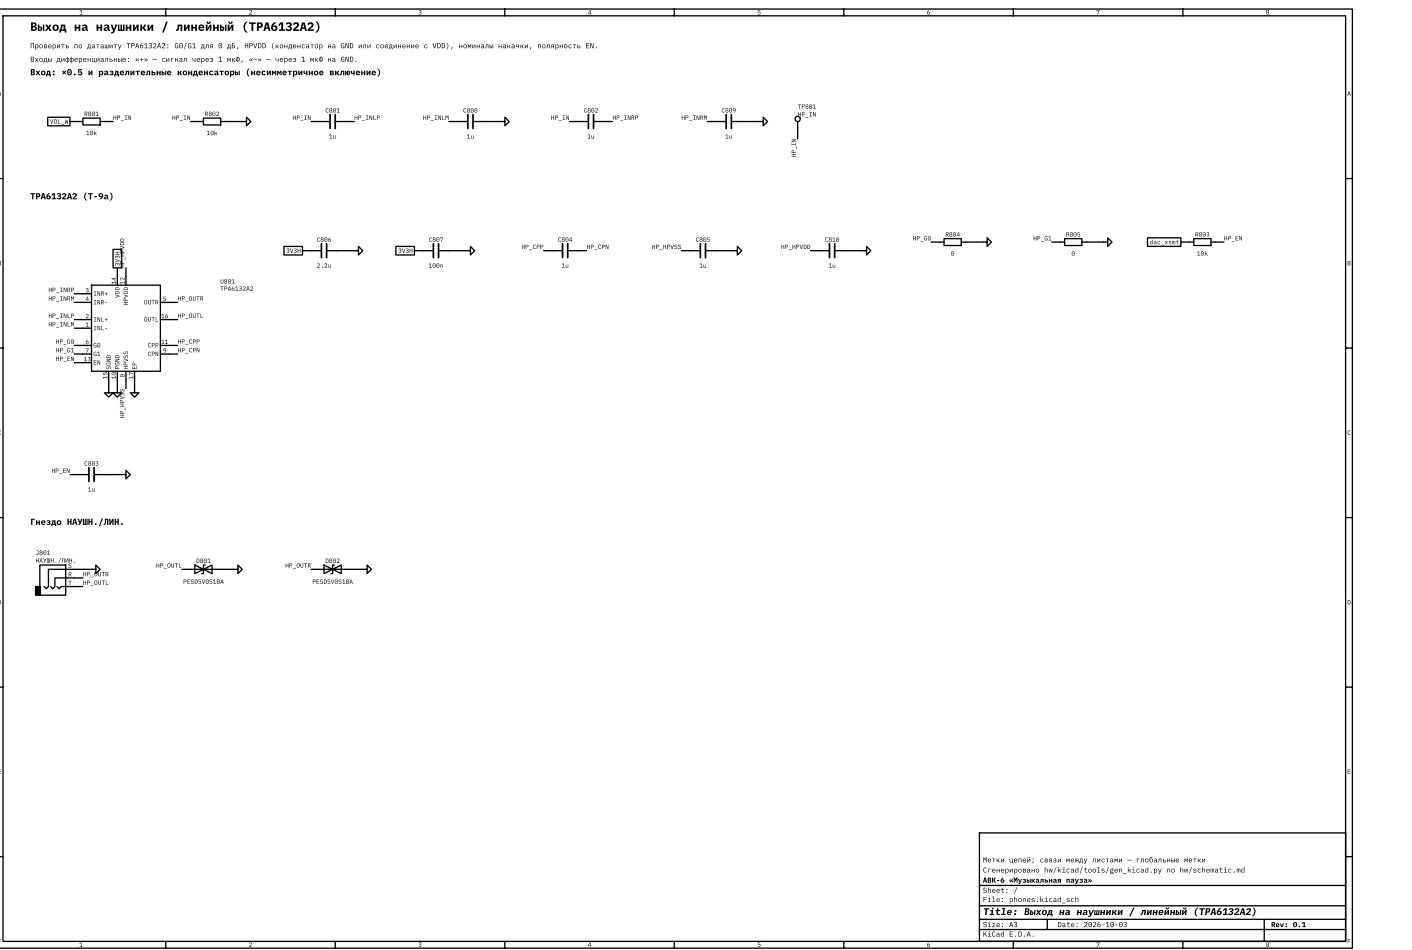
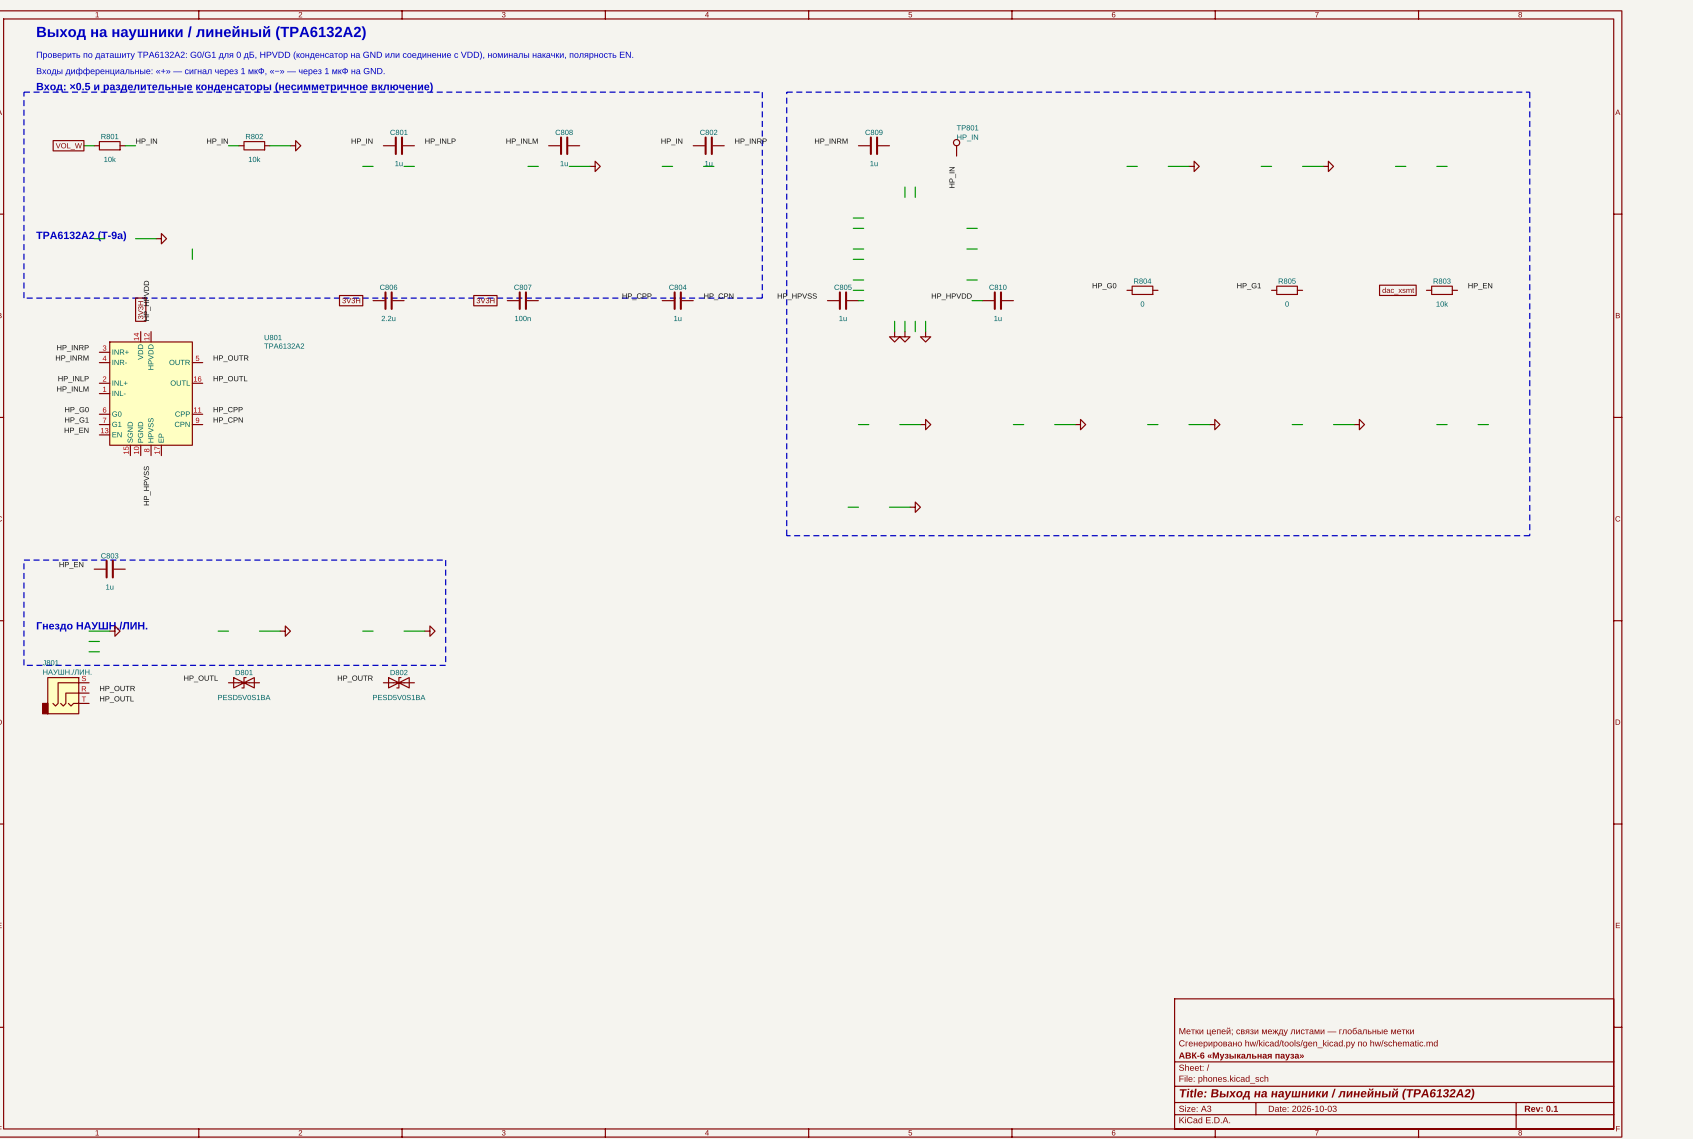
line: none -> (23, 92) (762, 92) (762, 298) (23, 298) (23, 92)
line: none -> (786, 92) (1529, 92) (1529, 535) (786, 535) (786, 92)
wire: (311, 121) (319, 121) -> (362, 166) (373, 166)
wire: (345, 121) (354, 121) -> (404, 166) (414, 166)
wire: (448, 121) (457, 121) -> (527, 166) (538, 166)
wire: (483, 121) (500, 121) -> (569, 166) (589, 166)
power symbol position: (504, 121) -> (595, 166)
wire: (569, 121) (578, 121) -> (662, 166) (672, 166)
wire: (603, 121) (612, 121) -> (703, 166) (713, 166)
wire: (707, 121) (715, 121) -> (853, 218) (863, 218)
wire: (741, 121) (758, 121) -> none
power symbol: (763, 121) -> none
wire: (797, 130) (797, 138) -> (915, 187) (915, 197)
wire: none -> (1126, 166) (1137, 166)
wire: none -> (1168, 166) (1188, 166)
power symbol: none -> (1194, 166)
wire: none -> (1261, 166) (1271, 166)
wire: none -> (1302, 166) (1323, 166)
power symbol: none -> (1328, 166)
wire: none -> (1395, 166) (1405, 166)
wire: none -> (1436, 166) (1447, 166)
wire: none -> (904, 187) (904, 197)
wire: none -> (853, 228) (863, 228)
wire: none -> (966, 228) (977, 228)
wire: none -> (94, 238) (104, 238)
wire: none -> (135, 238) (156, 238)
power symbol: none -> (161, 238)
wire: none -> (853, 249) (863, 249)
wire: none -> (966, 249) (977, 249)
wire: none -> (853, 259) (863, 259)
wire: none -> (853, 280) (863, 280)
wire: none -> (966, 280) (977, 280)
wire: (931, 242) (939, 242) -> none
wire: (965, 242) (982, 242) -> none
power symbol: (987, 242) -> none
wire: (1051, 242) (1060, 242) -> none
wire: (1086, 242) (1103, 242) -> none
power symbol: (1107, 242) -> none
wire: (1180, 242) (1189, 242) -> none
wire: (1215, 242) (1223, 242) -> none
wire: (302, 250) (311, 250) -> none
wire: (336, 250) (354, 250) -> none
power symbol: (358, 250) -> none
wire: (414, 250) (423, 250) -> none
wire: (448, 250) (466, 250) -> none
power symbol: (470, 250) -> none
wire: (543, 250) (552, 250) -> none
wire: (578, 250) (586, 250) -> none
wire: (681, 250) (690, 250) -> (853, 290) (863, 290)
wire: (720, 250) (733, 250) -> none
power symbol: (737, 250) -> none
wire: (845, 250) (862, 250) -> none
power symbol: (866, 250) -> none
wire: (117, 267) (117, 276) -> none
wire: (125, 267) (125, 276) -> (192, 249) (192, 259)
wire: none -> (894, 321) (894, 331)
wire: none -> (904, 321) (904, 331)
wire: none -> (915, 321) (915, 331)
wire: none -> (925, 321) (925, 331)
power symbol: none -> (894, 336)
power symbol: none -> (904, 336)
power symbol: none -> (925, 336)
wire: (74, 293) (82, 293) -> none
wire: (74, 302) (82, 302) -> none
wire: (169, 302) (177, 302) -> none
wire: (74, 319) (82, 319) -> none
wire: (169, 319) (177, 319) -> none
wire: (74, 328) (82, 328) -> none
wire: (74, 345) (82, 345) -> none
wire: (169, 345) (177, 345) -> none
wire: (74, 354) (82, 354) -> none
wire: (169, 354) (177, 354) -> none
wire: none -> (858, 424) (868, 424)
wire: none -> (899, 424) (920, 424)
power symbol: none -> (925, 424)
wire: none -> (1013, 424) (1023, 424)
wire: none -> (1054, 424) (1075, 424)
power symbol: none -> (1080, 424)
wire: none -> (1147, 424) (1157, 424)
wire: none -> (1188, 424) (1209, 424)
power symbol: none -> (1214, 424)
wire: none -> (1292, 424) (1302, 424)
wire: none -> (1333, 424) (1354, 424)
power symbol: none -> (1359, 424)
wire: none -> (1436, 424) (1447, 424)
wire: none -> (1478, 424) (1488, 424)
wire: (74, 362) (82, 362) -> none
wire: (108, 379) (108, 388) -> none
wire: (117, 379) (117, 388) -> none
wire: (125, 379) (125, 388) -> none
wire: (134, 379) (134, 388) -> none
power symbol: (108, 392) -> none
power symbol: (117, 392) -> none
power symbol: (134, 392) -> none
wire: none -> (848, 507) (858, 507)
wire: none -> (889, 507) (910, 507)
power symbol: none -> (915, 507)
line: none -> (23, 560) (23, 665) (445, 665) (445, 560) (23, 560)
wire: (69, 474) (78, 474) -> none
wire: (104, 474) (121, 474) -> none
power symbol: (125, 474) -> none
power symbol: none -> (114, 631)
wire: (74, 569) (91, 569) -> (89, 631) (109, 631)
power symbol: (95, 569) -> none
wire: (181, 569) (190, 569) -> (218, 631) (228, 631)
wire: (216, 569) (233, 569) -> (259, 631) (280, 631)
power symbol position: (237, 569) -> (285, 631)
wire: (311, 569) (319, 569) -> (362, 631) (373, 631)
wire: (345, 569) (362, 569) -> (404, 631) (424, 631)
power symbol position: (367, 569) -> (429, 631)
wire: (74, 577) (82, 577) -> (89, 641) (99, 641)
wire: (74, 586) (82, 586) -> (89, 651) (99, 651)

